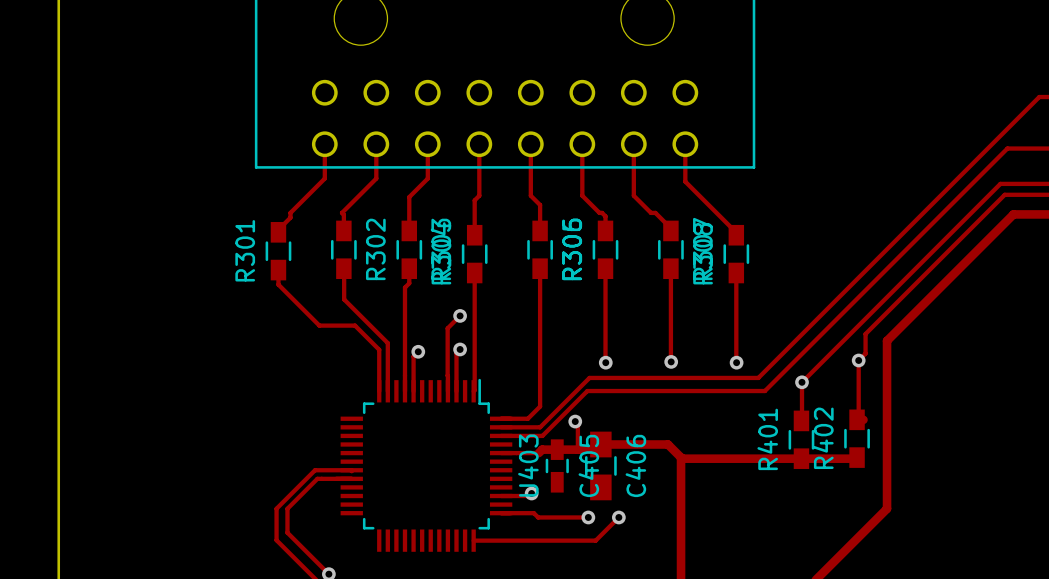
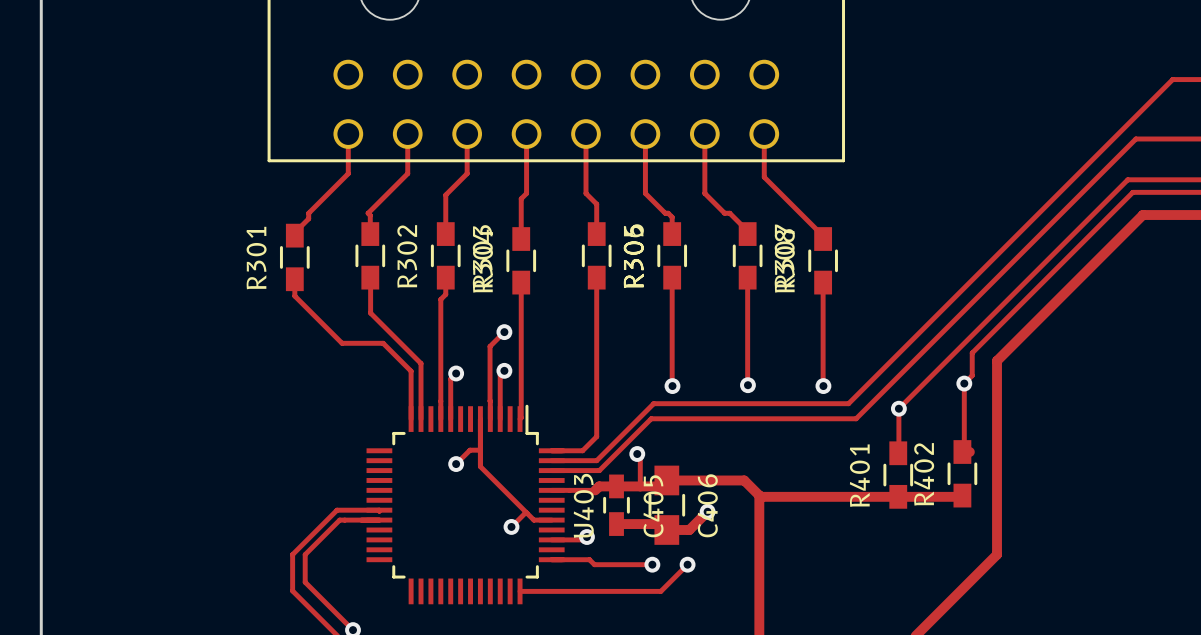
track: none -> (480, 419) (480, 466) (533, 520) (551, 520)
track: none -> (480, 450) (470, 450) (456, 464)
via: none -> (456, 464)
track: none -> (707, 511) (689, 530) (666, 530)
via: none -> (707, 511)
track: none -> (526, 513) (511, 526)
track: none -> (616, 524) (660, 524)
via: none -> (511, 526)

